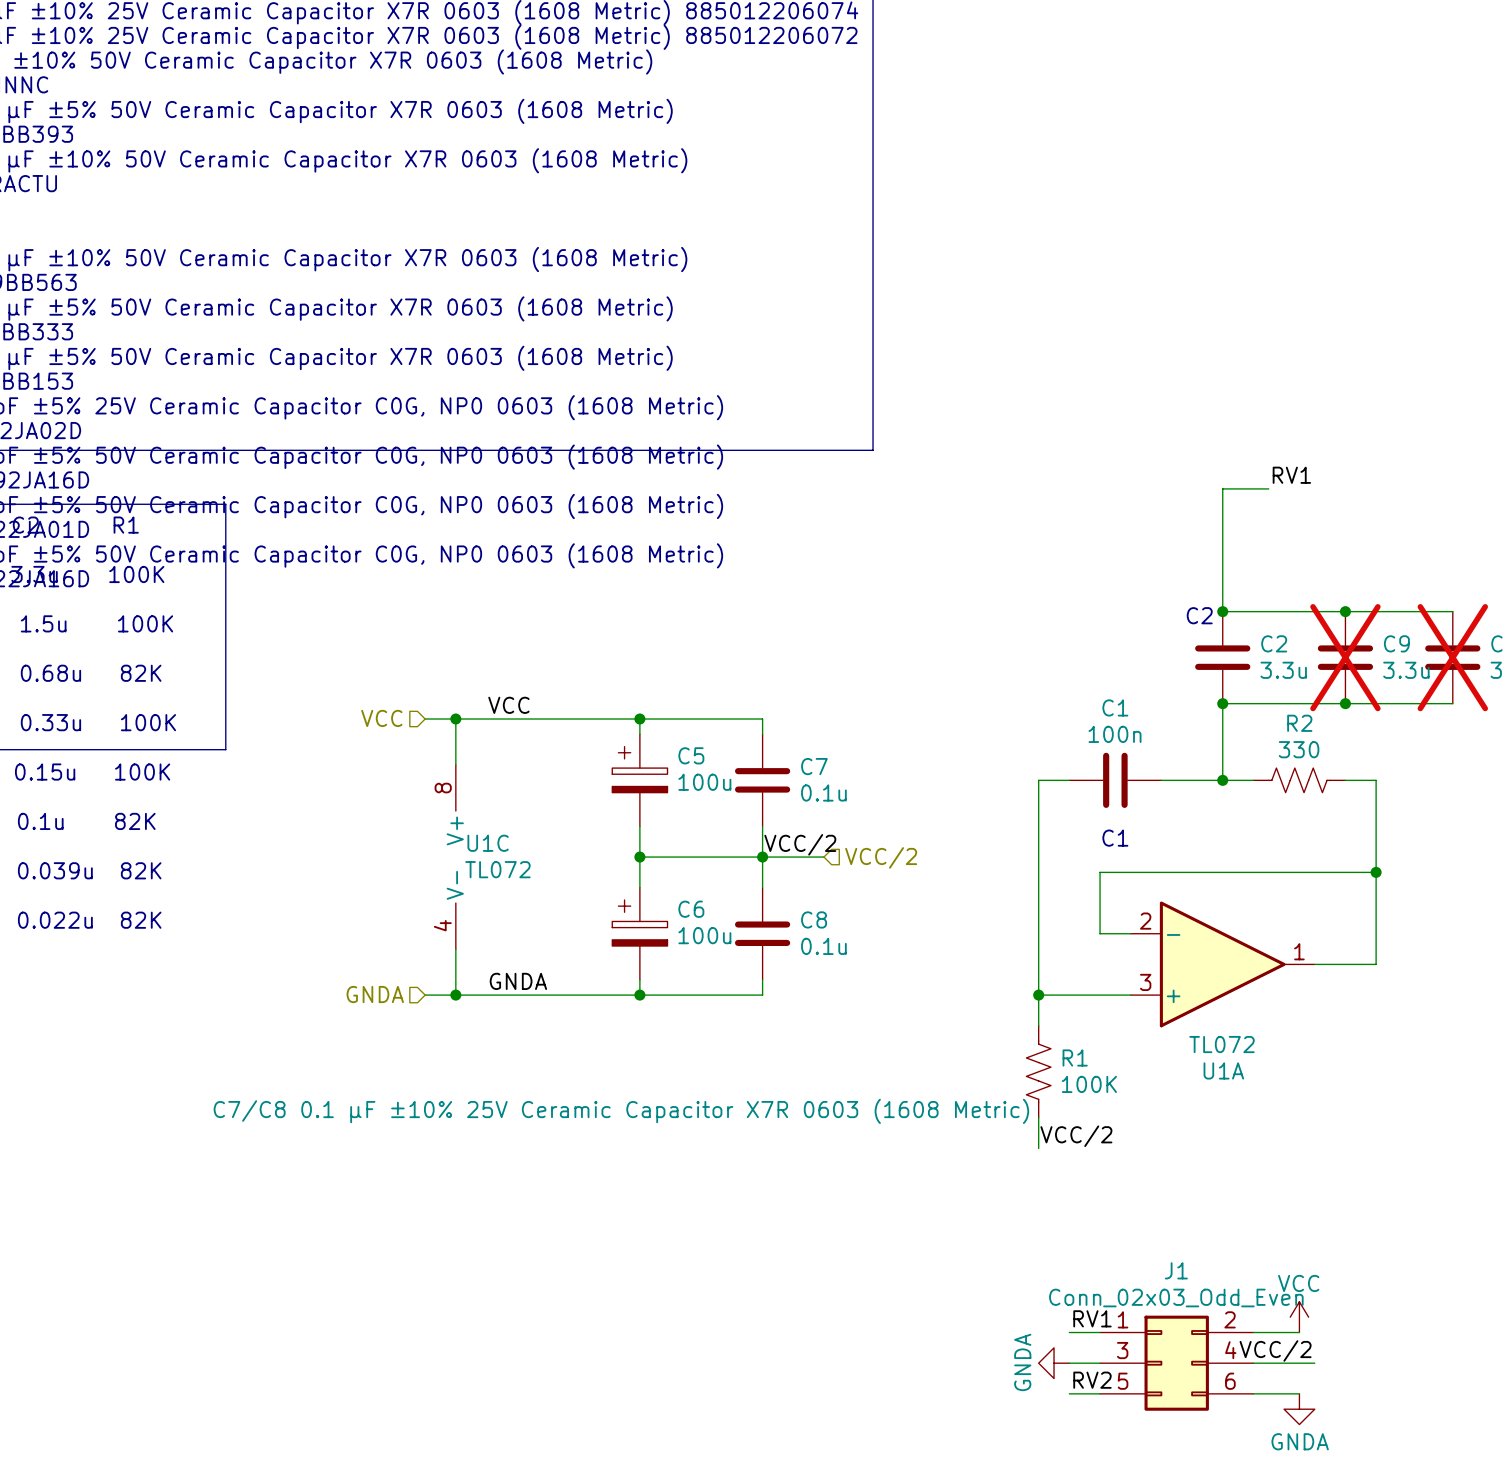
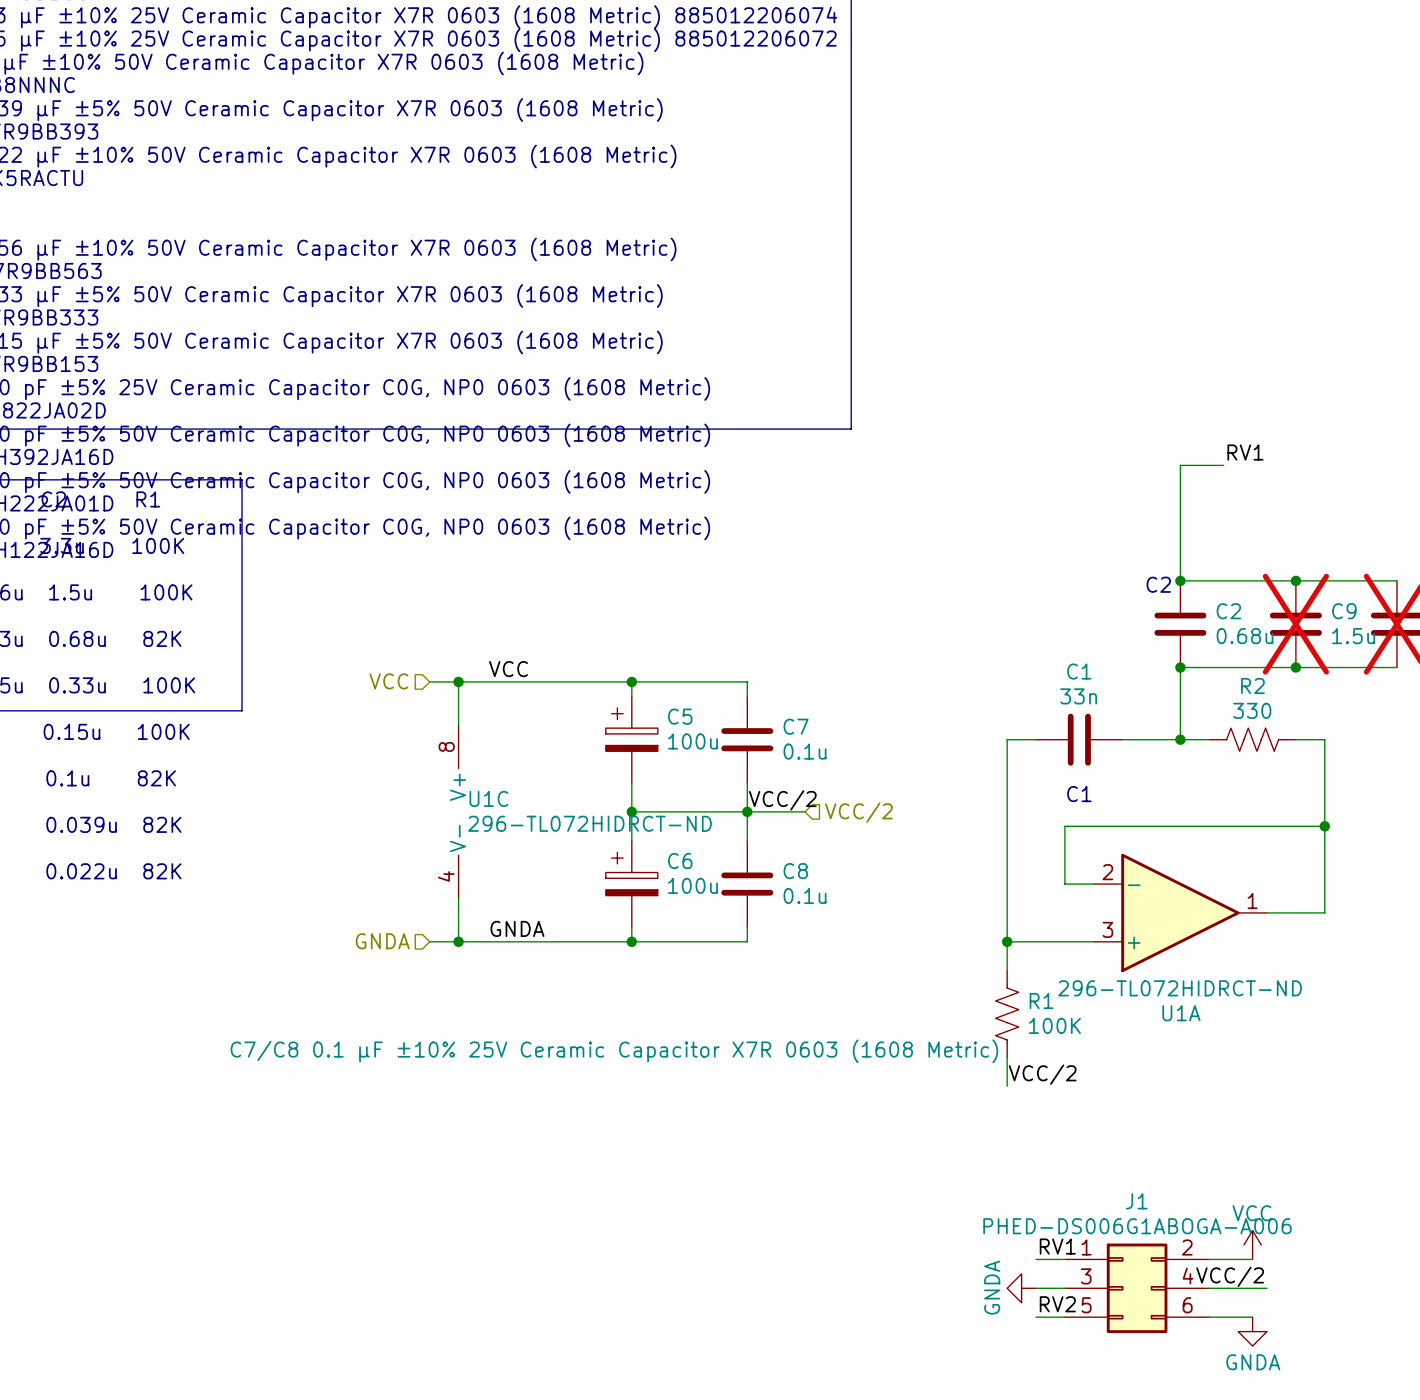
C2 value: 3.3u (1283, 670) -> 0.68u (1245, 636)
C9 value: 3.3u (1406, 670) -> 1.5u (1353, 636)
C1 value: 100n (1115, 734) -> 33n (1078, 696)
U1C value: TL072 (497, 869) -> 296-TL072HIDRCT-ND (589, 823)
U1A value: TL072 (1222, 1044) -> 296-TL072HIDRCT-ND (1180, 988)
J1 value: Conn_02x03_Odd_Even (1176, 1297) -> PHED-DS006G1ABOGA-A006 (1137, 1226)

